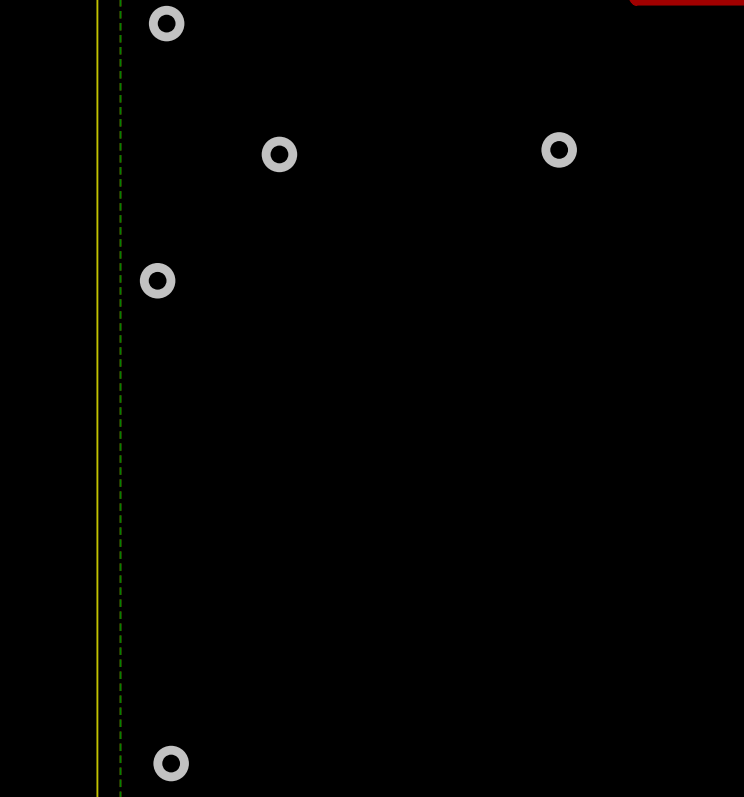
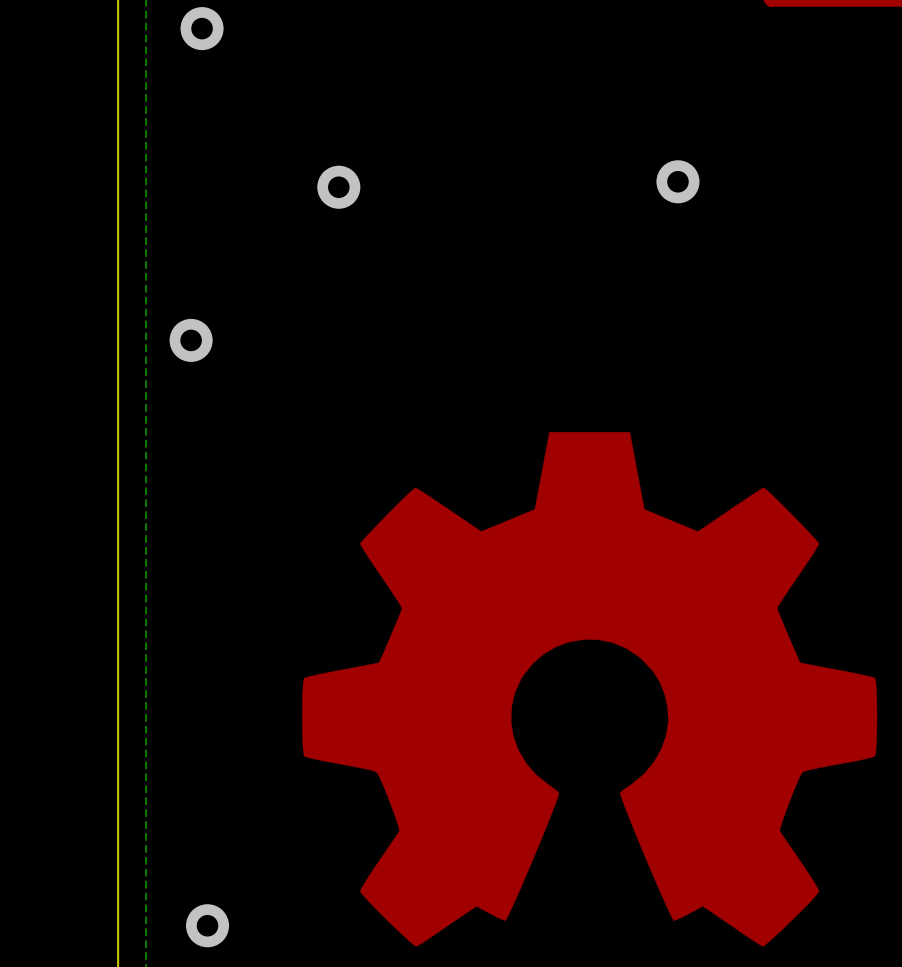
drawing: none -> [302, 432, 878, 947]

